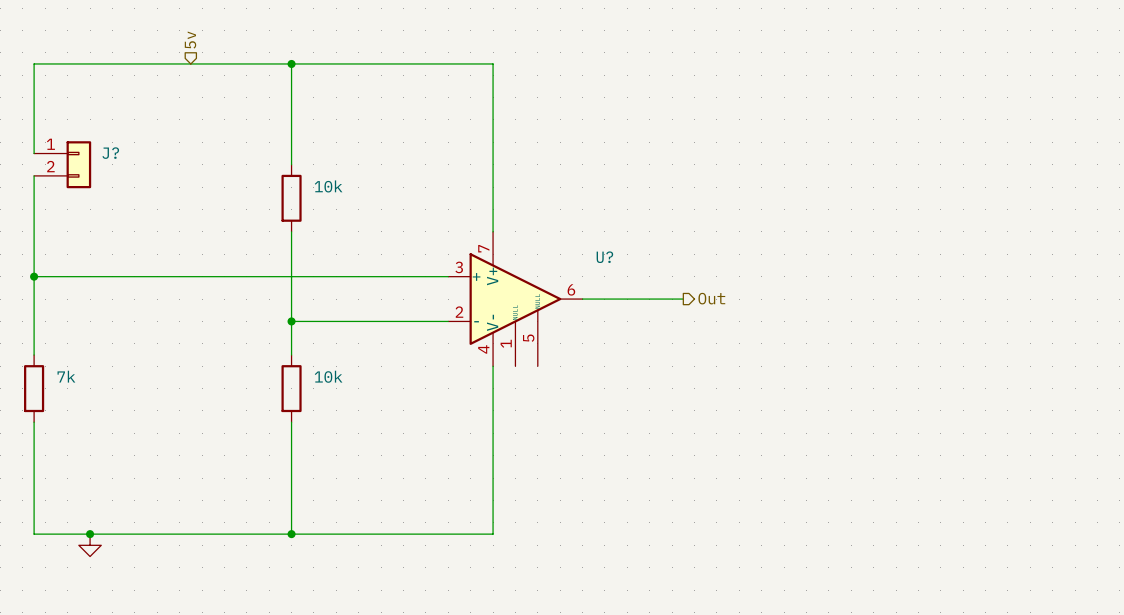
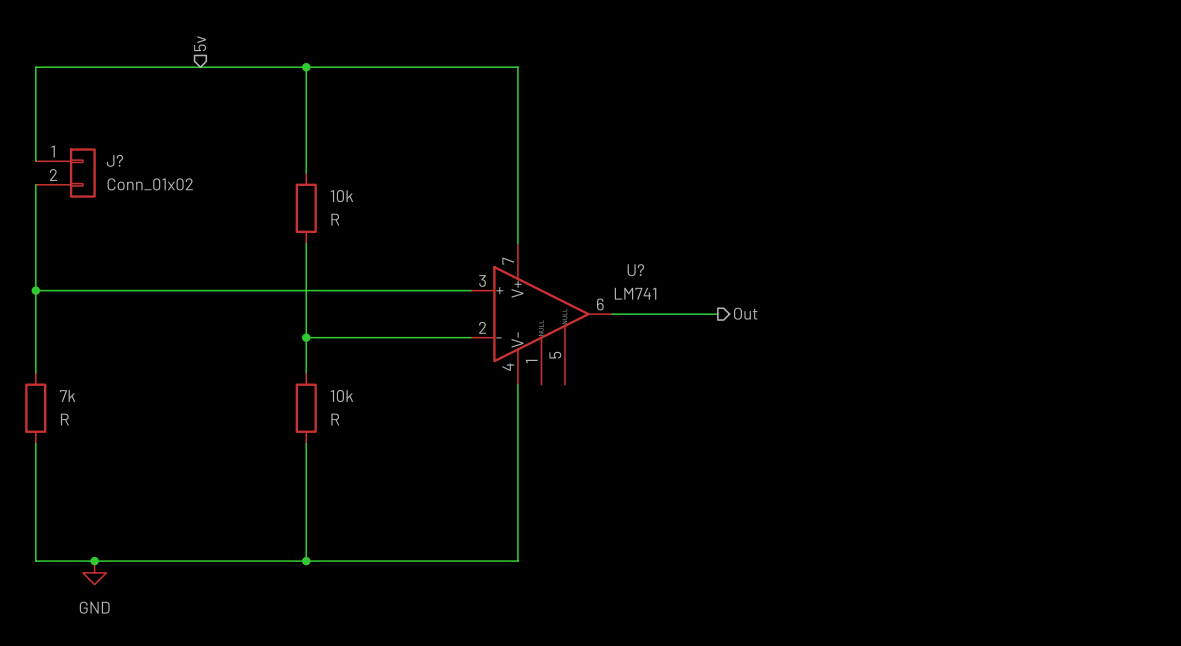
J? value: none -> Conn_01x02 (150, 184)
10k value: none -> R (335, 219)
U? value: none -> LM741 (635, 293)
7k value: none -> R (64, 419)
10k value: none -> R (335, 419)
power symbol text: none -> GND (94, 607)

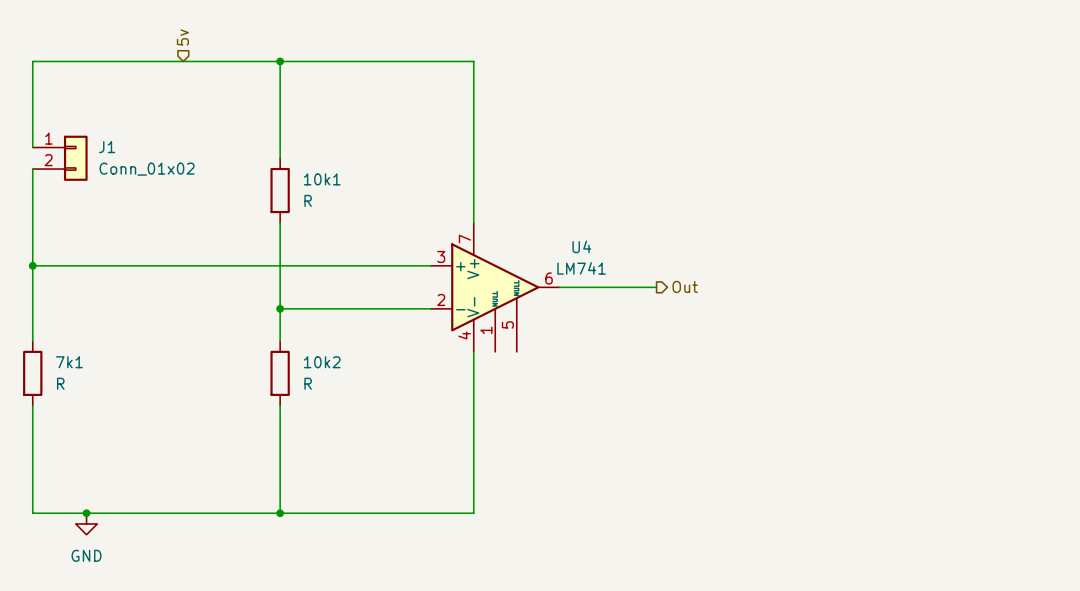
J? name: J? (114, 160) -> J1 (107, 147)
10k name: 10k (341, 196) -> 10k1 (322, 179)
U? name: U? (635, 270) -> U4 (581, 246)
7k name: 7k (67, 396) -> 7k1 (69, 362)
10k name: 10k (341, 396) -> 10k2 (322, 362)

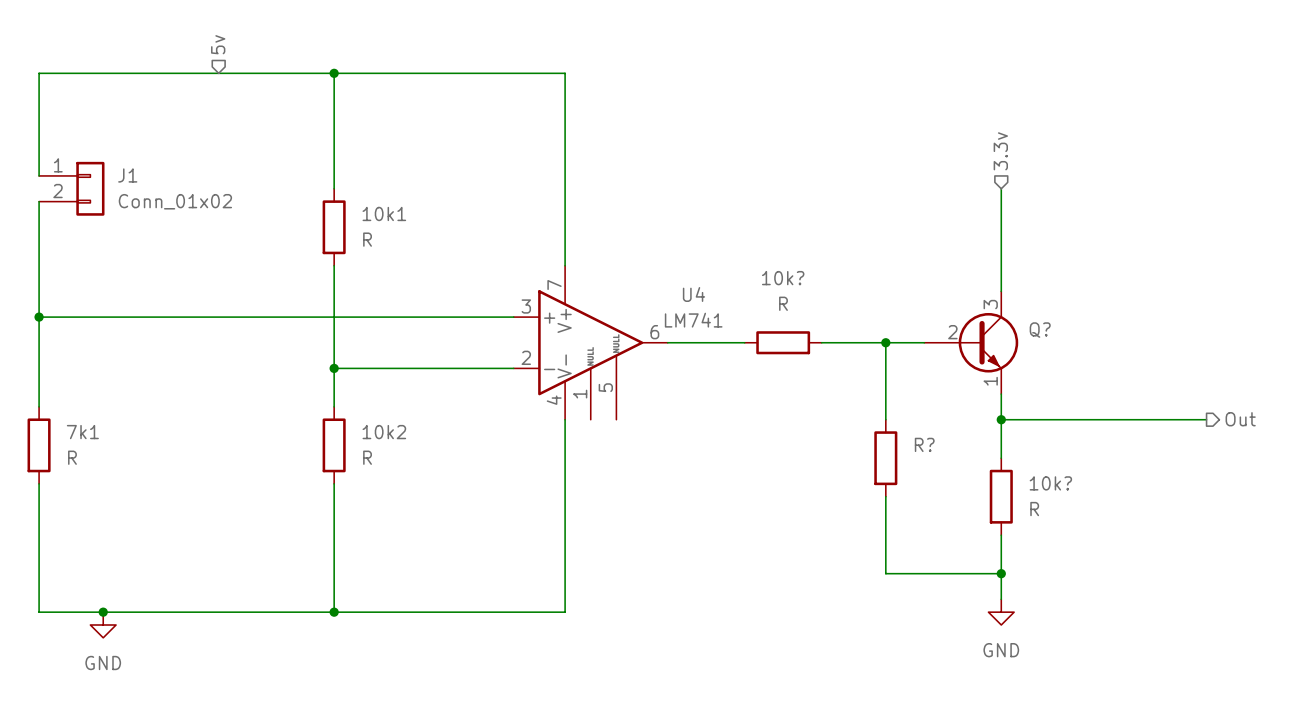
hierarchical label: none -> 3.3v (1000, 151)
wire: none -> (1001, 188) (1001, 291)
hierarchical label: Out (685, 286) -> none
wire: (624, 287) (656, 287) -> none
10k?: none -> R (783, 342)
wire: none -> (821, 342) (924, 342)
wire: none -> (885, 342) (885, 419)
junction: none -> (885, 342)
Q?: none -> (971, 342)
wire: none -> (1001, 394) (1001, 458)
wire: none -> (1001, 419) (1206, 419)
junction: none -> (1001, 419)
hierarchical label: none -> Out (1240, 419)
R?: none -> (885, 458)
wire: none -> (885, 496) (885, 573) (1001, 573)
10k?: none -> R (1001, 496)
wire: none -> (1001, 535) (1001, 599)
junction: none -> (1001, 573)
power symbol: none -> GND (1001, 612)

